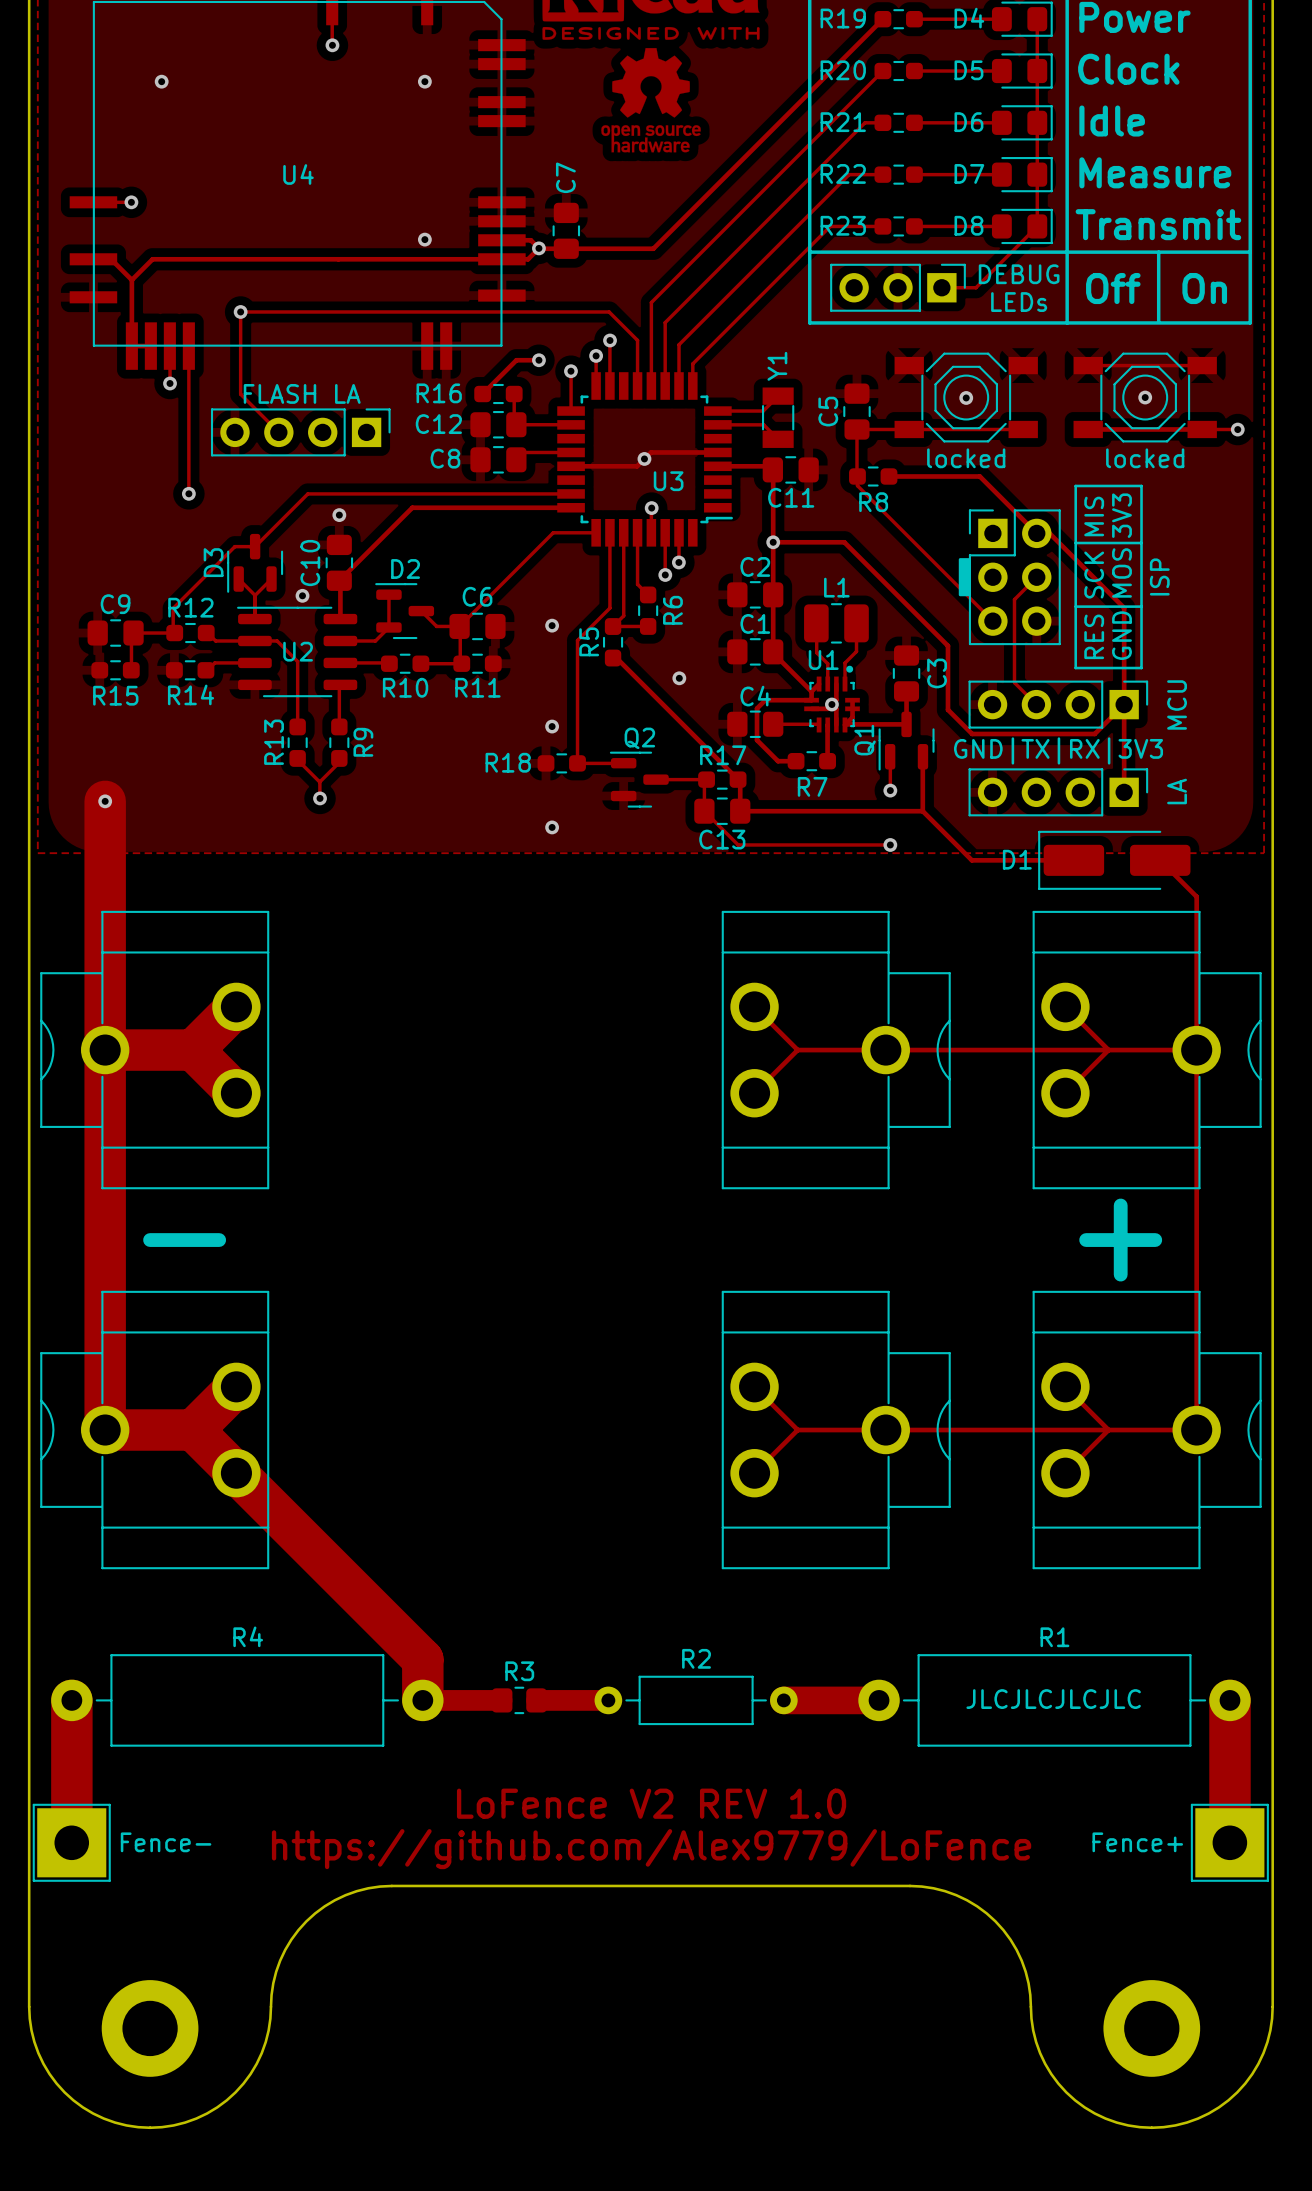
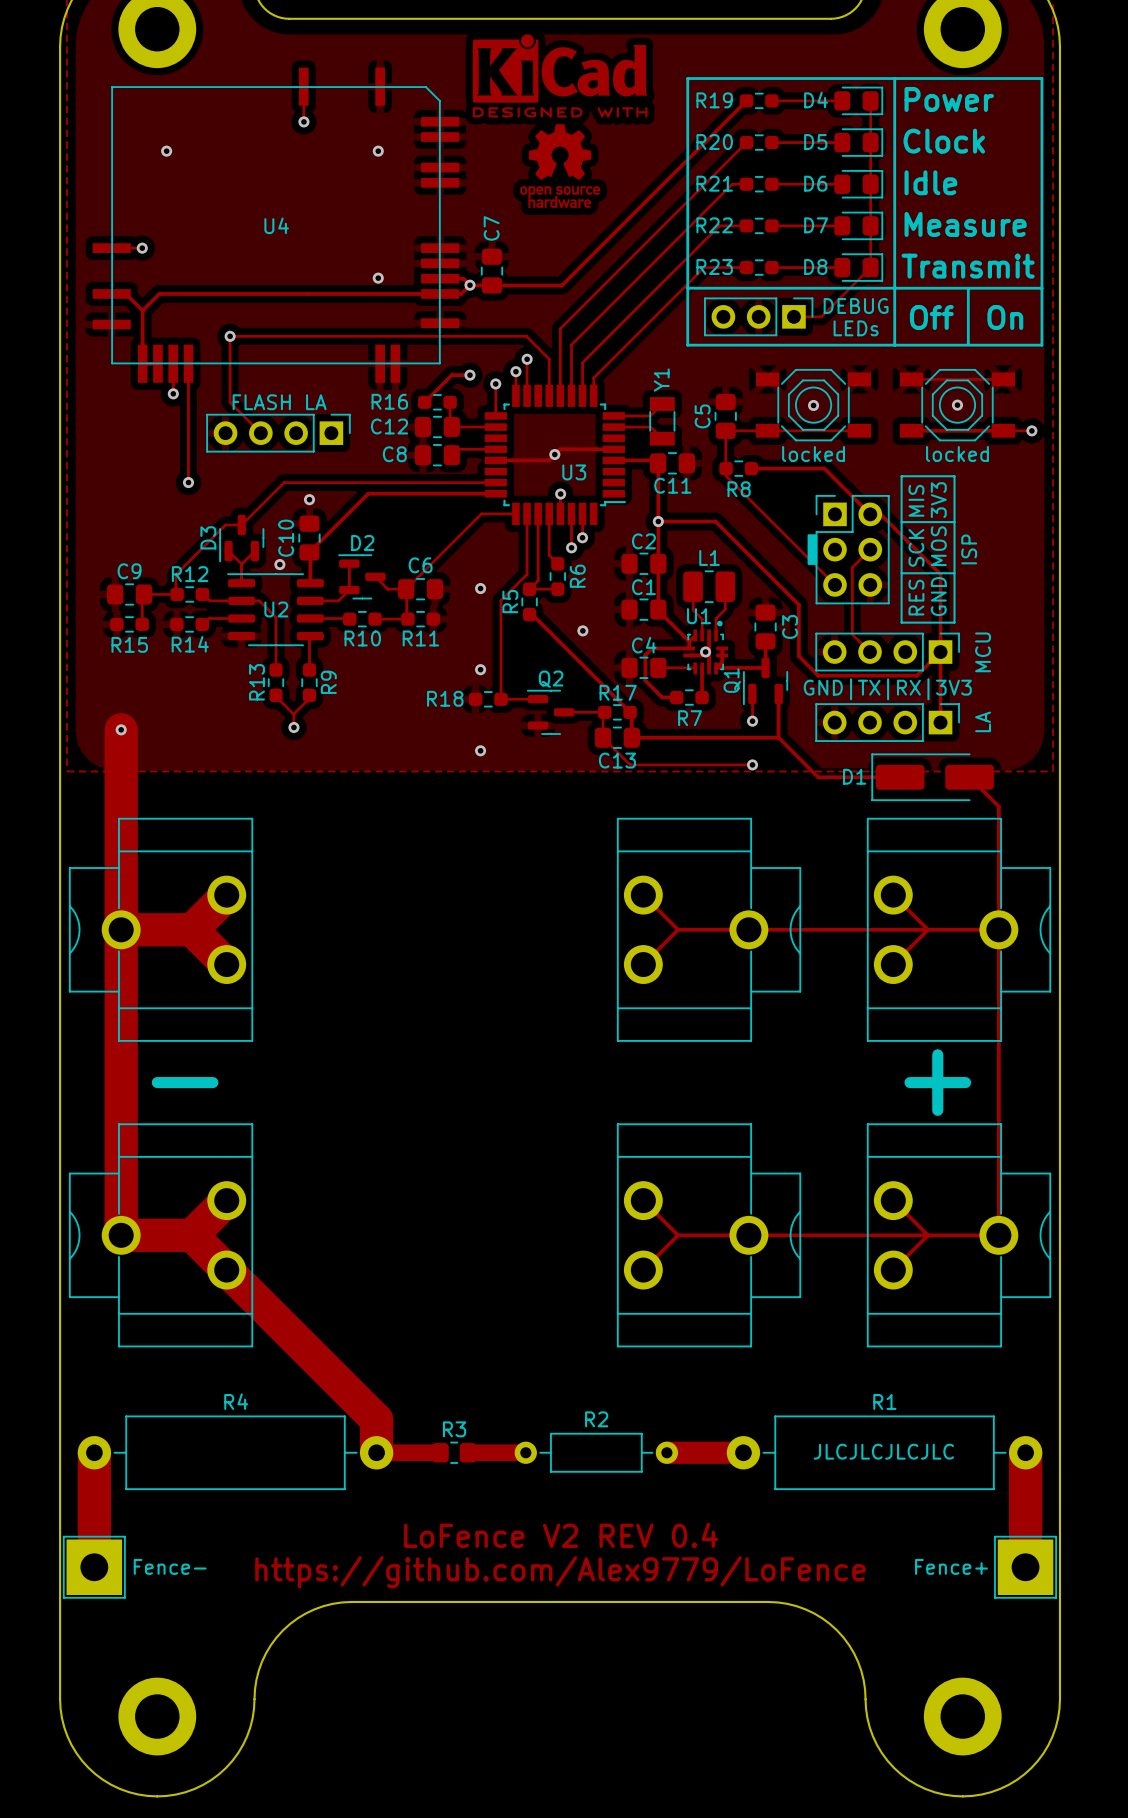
text: LoFence V2 REV 1.0 (651, 1803) -> LoFence V2 REV 0.4 (561, 1535)

